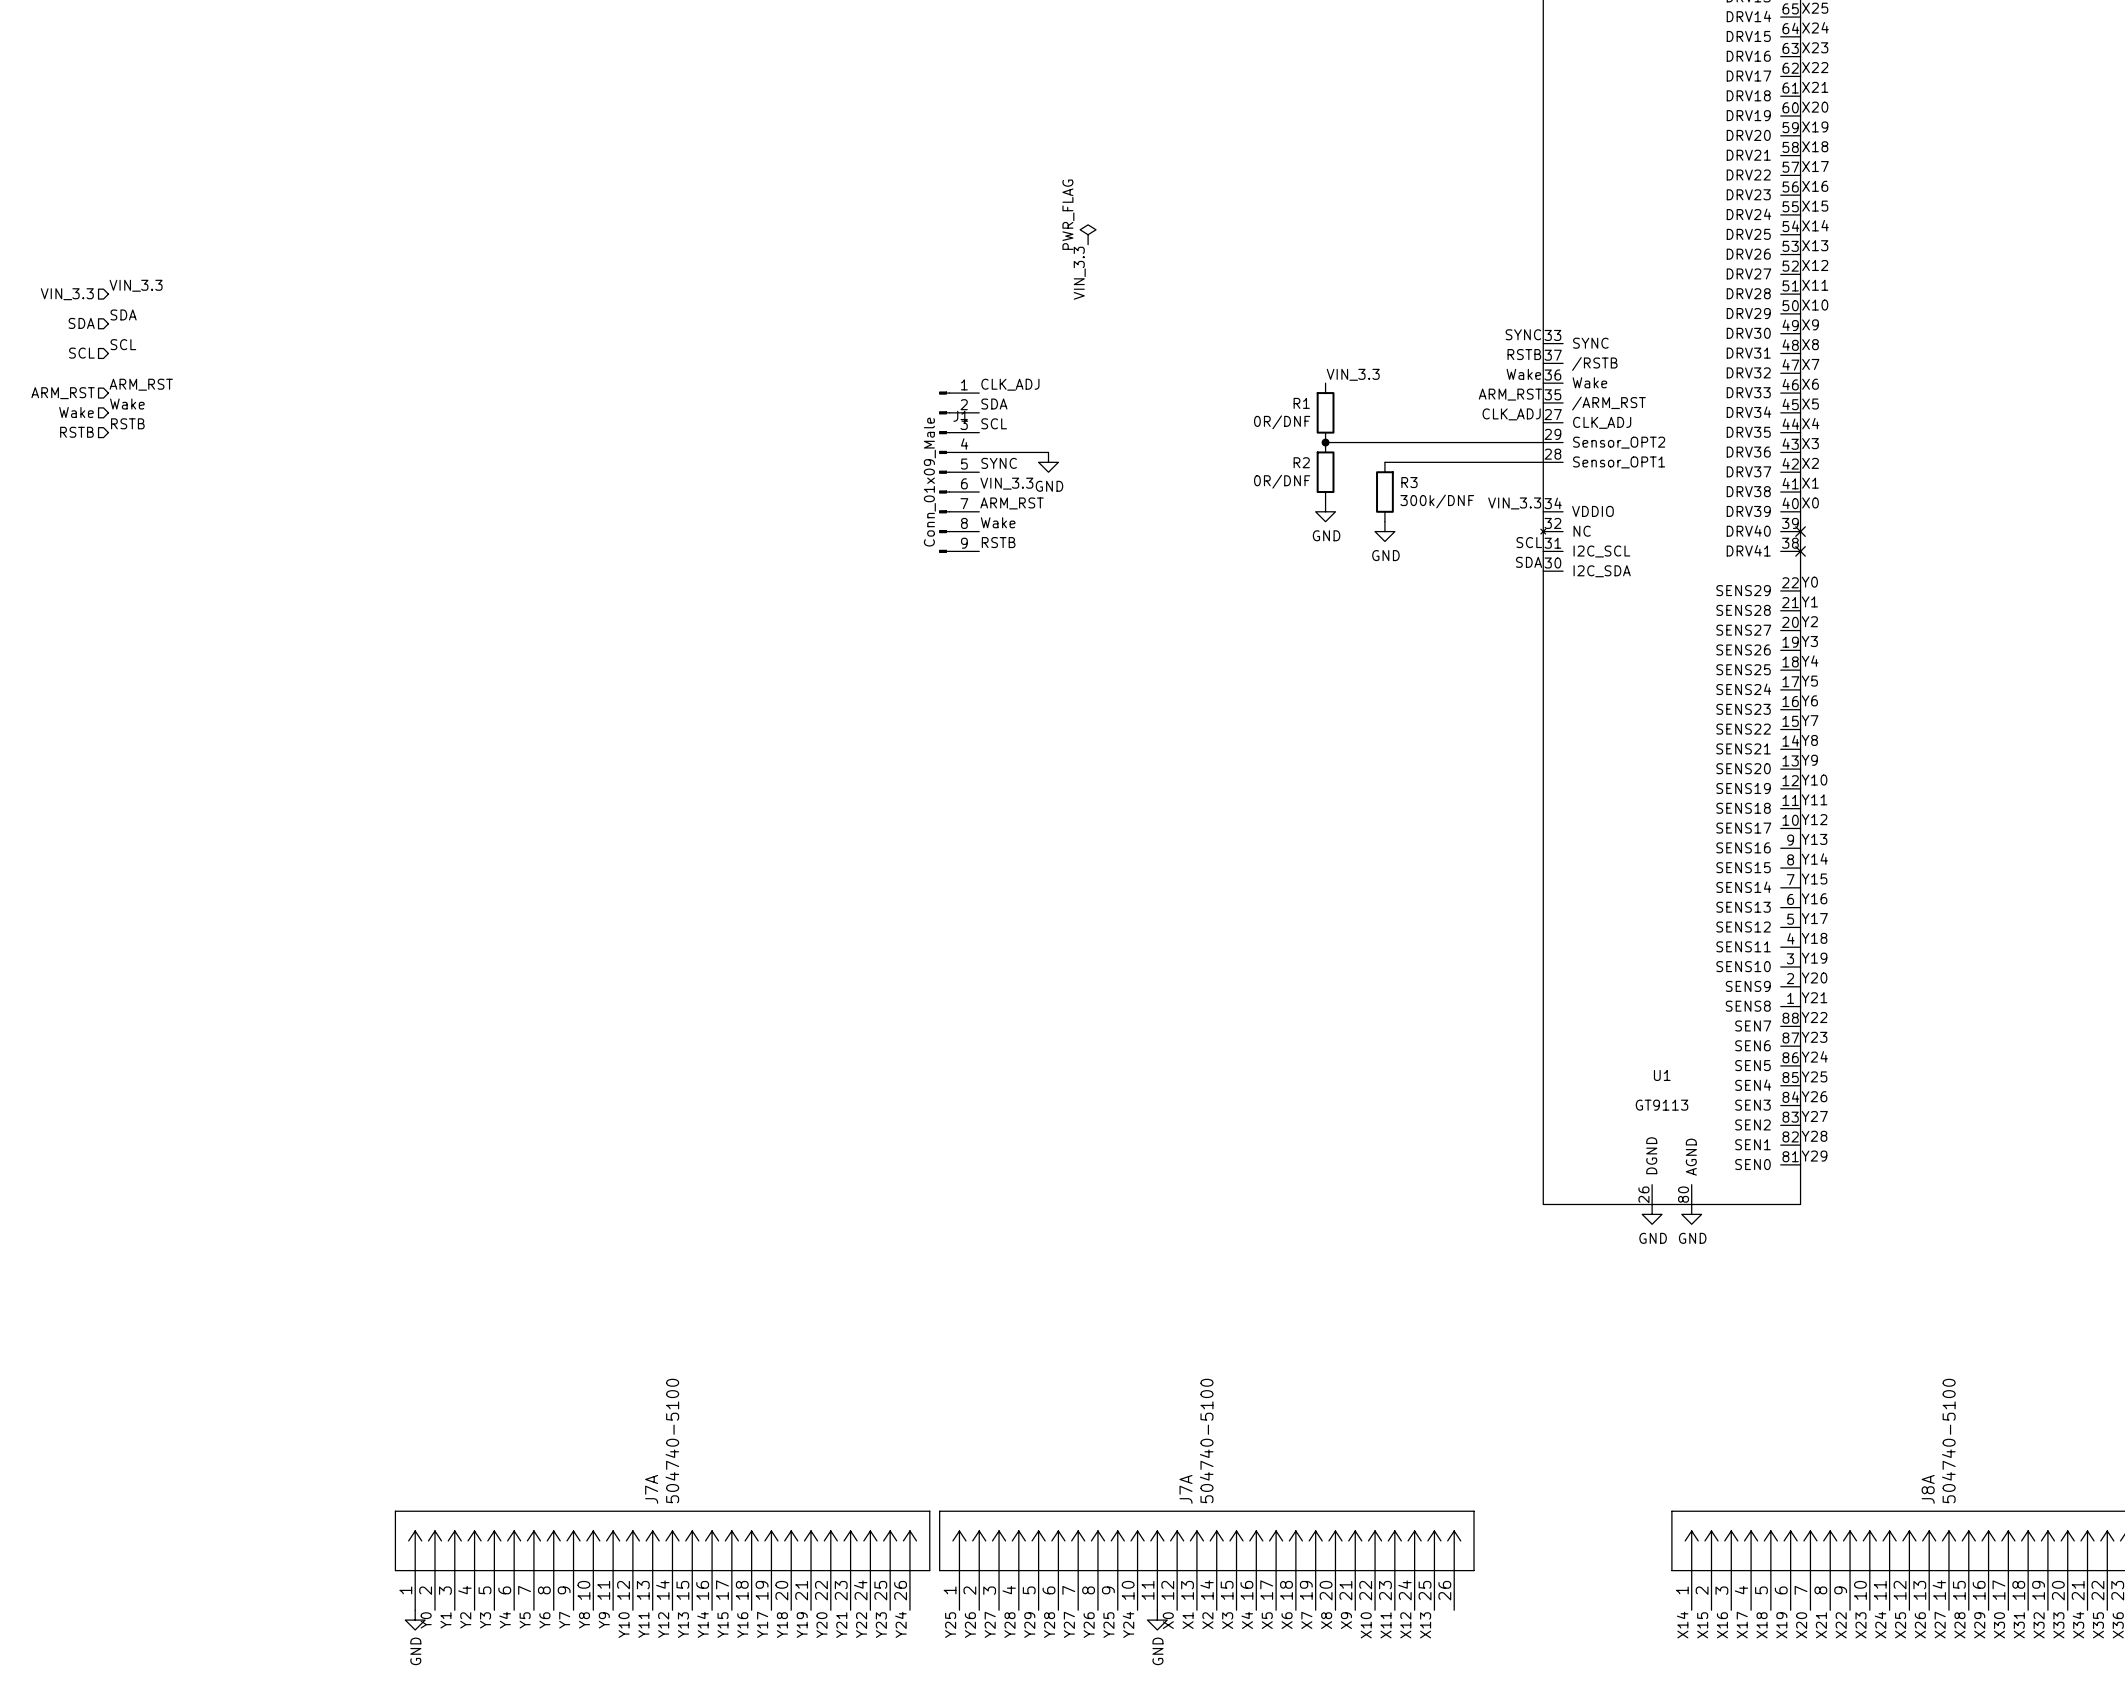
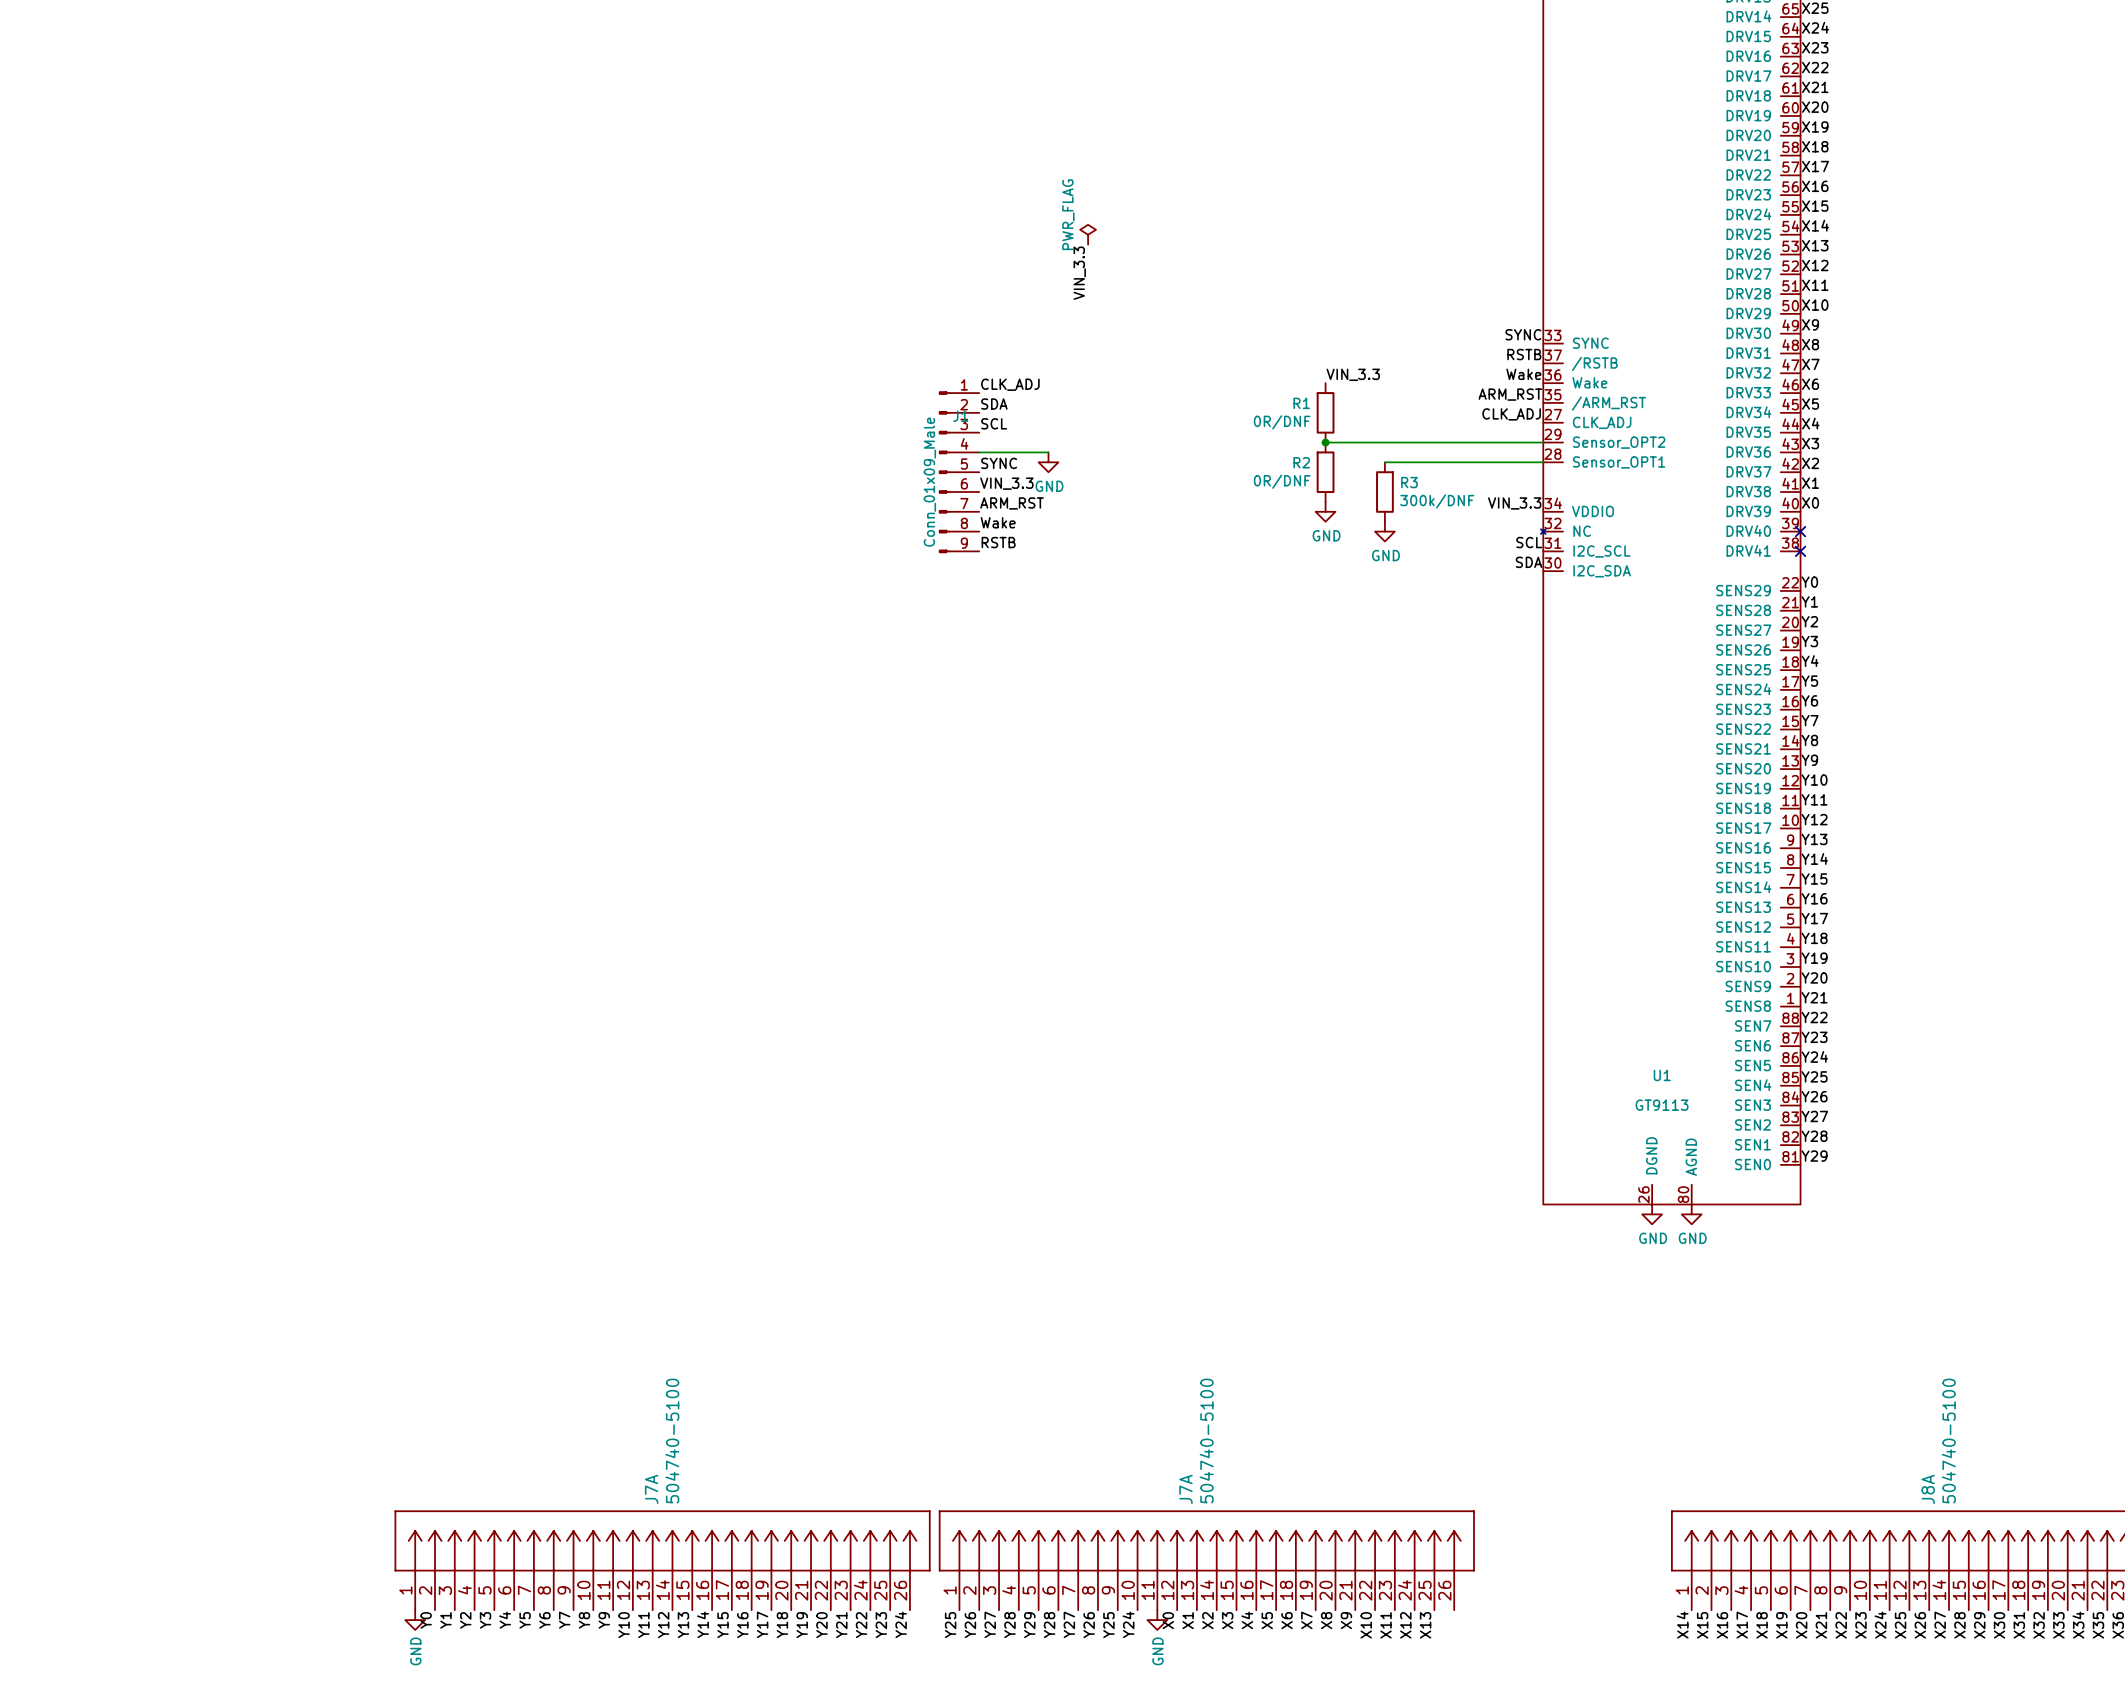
label: VIN_3.3 (136, 285) -> none
hierarchical label: VIN_3.3 (67, 294) -> none
label: SDA (123, 314) -> none
hierarchical label: SDA (81, 323) -> none
label: SCL (123, 344) -> none
hierarchical label: SCL (81, 353) -> none
label: ARM_RST (141, 384) -> none
hierarchical label: ARM_RST (63, 393) -> none
label: Wake (127, 404) -> none
hierarchical label: Wake (76, 412) -> none
label: RSTB (127, 423) -> none
hierarchical label: RSTB (76, 432) -> none

